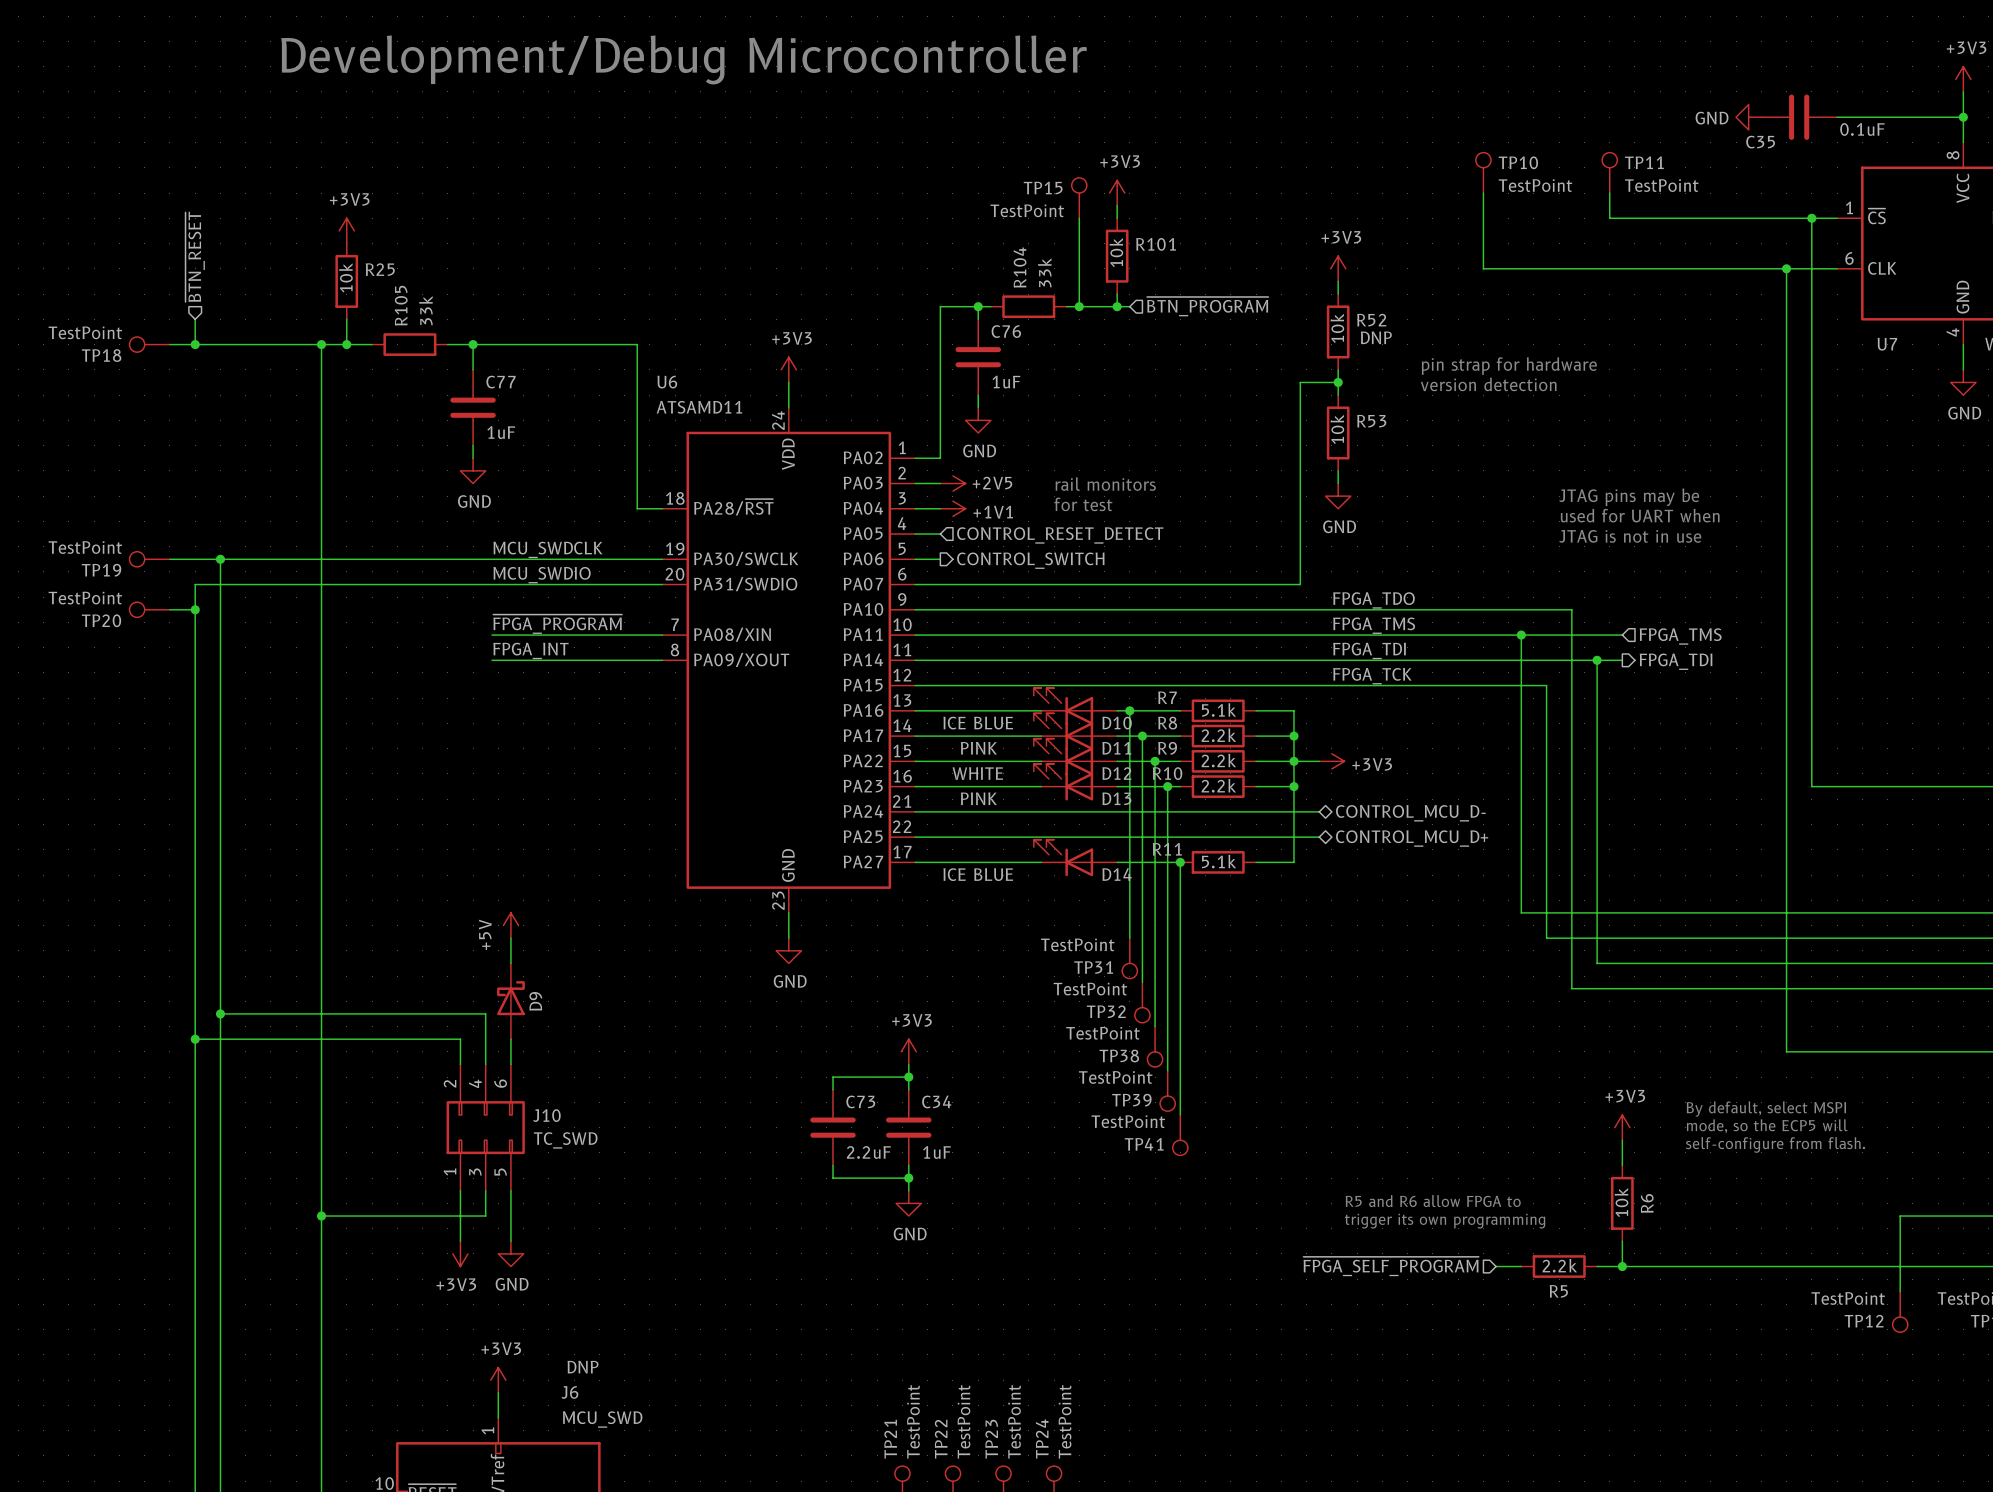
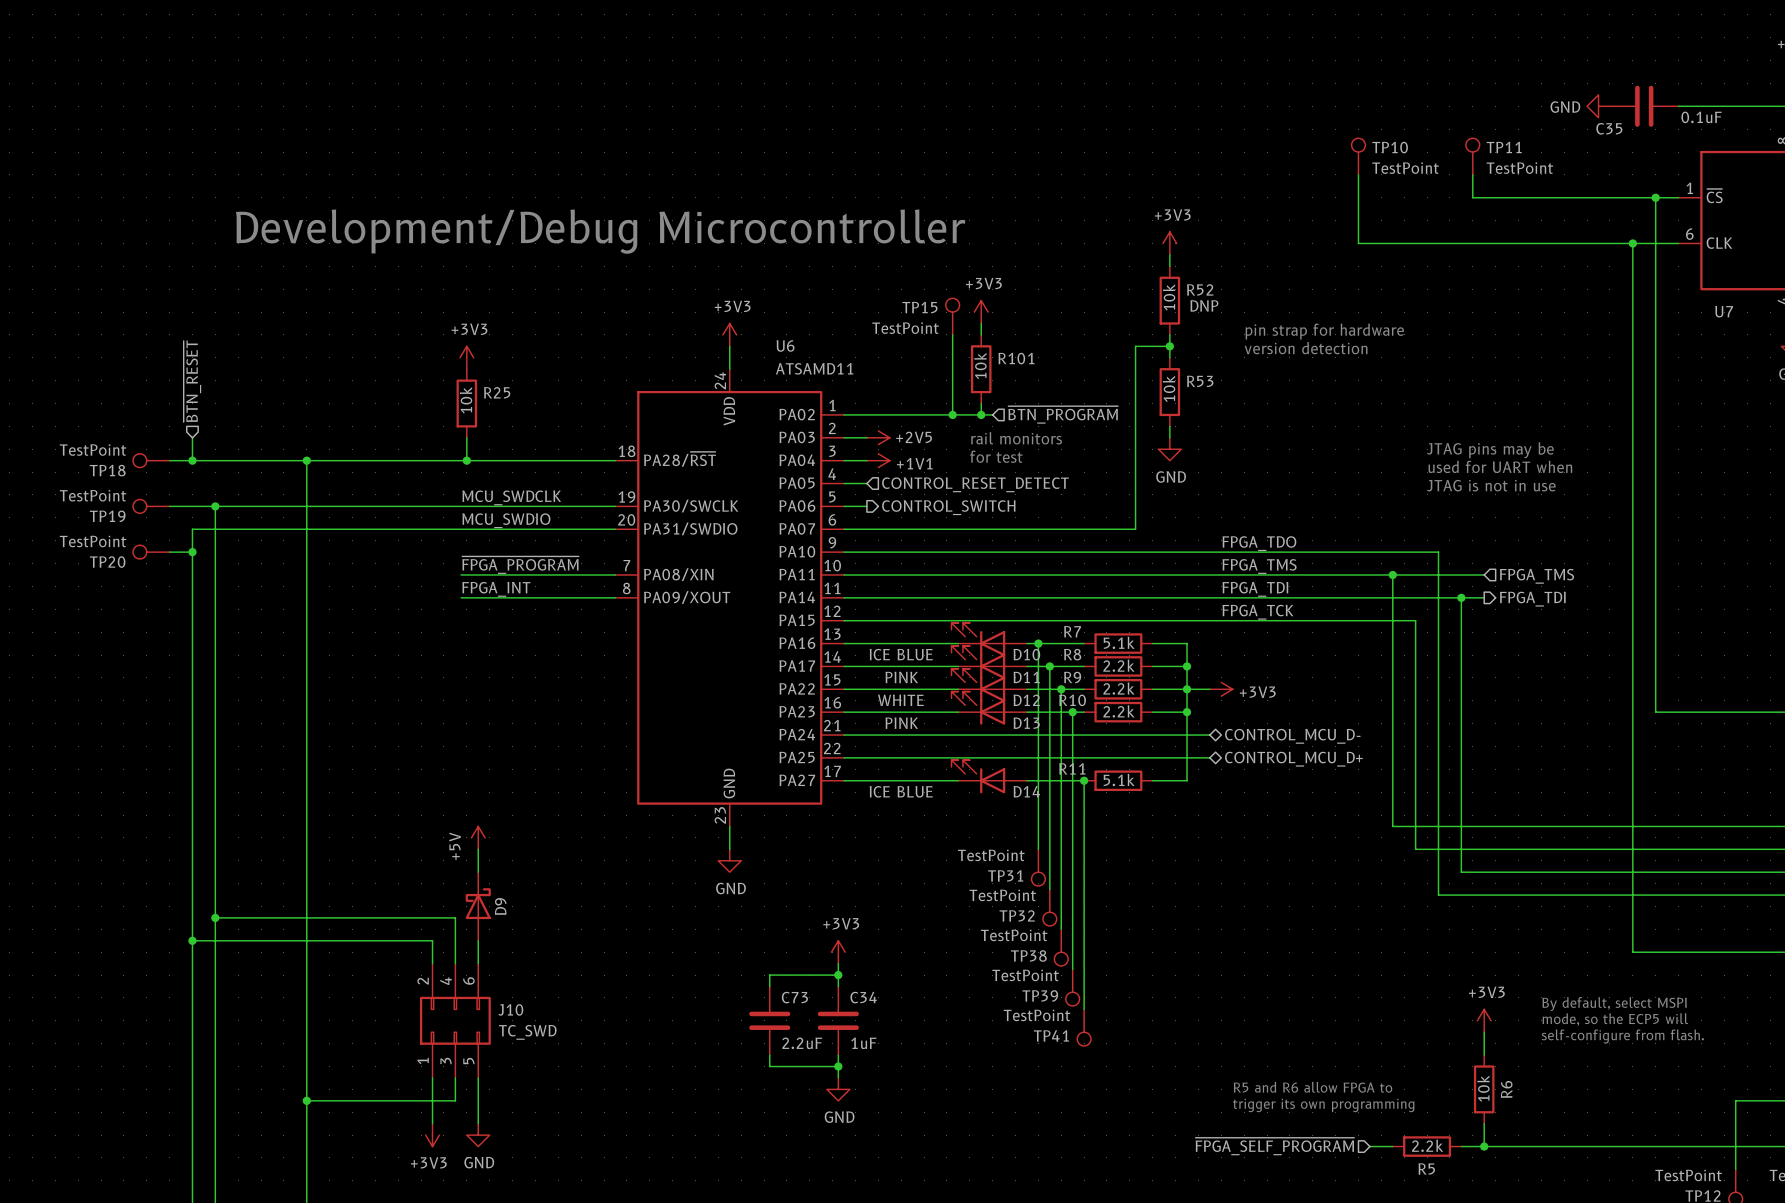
text position: Development/Debug Microcontroller (684, 59) -> Development/Debug Microcontroller (600, 231)
power symbol: +3V3 (1117, 193) -> none
TP15 position: (1079, 198) -> (952, 316)
wire: (1117, 205) (1117, 218) -> none
wire: (1079, 218) (1079, 306) -> (952, 334) (952, 414)
power symbol position: +3V3 (346, 230) -> +3V3 (466, 357)
hierarchical label position: ~{BTN_RESET} (195, 256) -> ~{BTN_RESET} (192, 381)
R101 position: (1117, 256) -> (981, 369)
power symbol position: +3V3 (1338, 268) -> +3V3 (1169, 243)
R25 position: (346, 281) -> (466, 403)
wire: (1338, 281) (1338, 294) -> (1169, 254) (1169, 266)
wire: (1117, 294) (1117, 306) -> none
wire: (978, 306) (978, 319) -> (981, 323) (981, 334)
junction: (978, 306) -> none
wire: (990, 306) (940, 306) (940, 458) -> (992, 414) (866, 414)
R104: 33k (1028, 306) -> none
wire: (1066, 306) (1129, 306) -> none
junction: (1079, 306) -> none
junction: (1117, 306) -> none
hierarchical label position: ~{BTN_PROGRAM} (1207, 306) -> ~{BTN_PROGRAM} (1063, 414)
wire: (195, 319) (195, 344) -> (192, 437) (192, 460)
wire: (346, 319) (346, 344) -> none
R52 position: (1338, 331) -> (1169, 300)
TP18 position: (149, 344) -> (151, 460)
wire: (169, 344) (372, 344) -> none
junction: (195, 344) -> none
wire: (321, 344) (321, 508) -> none
junction: (321, 344) -> none
junction: (346, 344) -> none
R105: 33k (409, 344) -> none
wire: (447, 344) (637, 344) (637, 508) -> (169, 460) (592, 460)
wire: (473, 344) (473, 369) -> (466, 437) (466, 460)
junction: (473, 344) -> none
power symbol: none -> +3V3 (981, 312)
C76: 1uF (978, 357) -> none
text position: pin strap for hardware (1509, 366) -> pin strap for hardware (1324, 331)
wire: (1338, 369) (1338, 395) -> (1169, 334) (1169, 357)
U6 name position: U6 (667, 382) -> U6 (785, 345)
junction: none -> (1169, 346)
wire: (1338, 382) (1300, 382) (1300, 584) (1237, 584) -> (1169, 346) (1135, 346) (1135, 529)
junction: (1338, 382) -> none
text position: version detection (1488, 384) -> version detection (1306, 348)
wire: (978, 395) (978, 407) -> (981, 403) (981, 414)
C77: 1uF (473, 407) -> none
U6 value position: ATSAMD11 (699, 407) -> ATSAMD11 (814, 368)
power symbol: GND (978, 420) -> none
R53 position: (1338, 432) -> (1169, 392)
wire: (473, 445) (473, 458) -> none
junction: none -> (952, 414)
junction: none -> (981, 414)
power symbol: GND (473, 470) -> none
wire: (1338, 470) (1338, 483) -> (1169, 426) (1169, 437)
power symbol position: GND (1338, 496) -> GND (1169, 449)
junction: none -> (192, 460)
junction: none -> (306, 460)
junction: none -> (466, 460)

